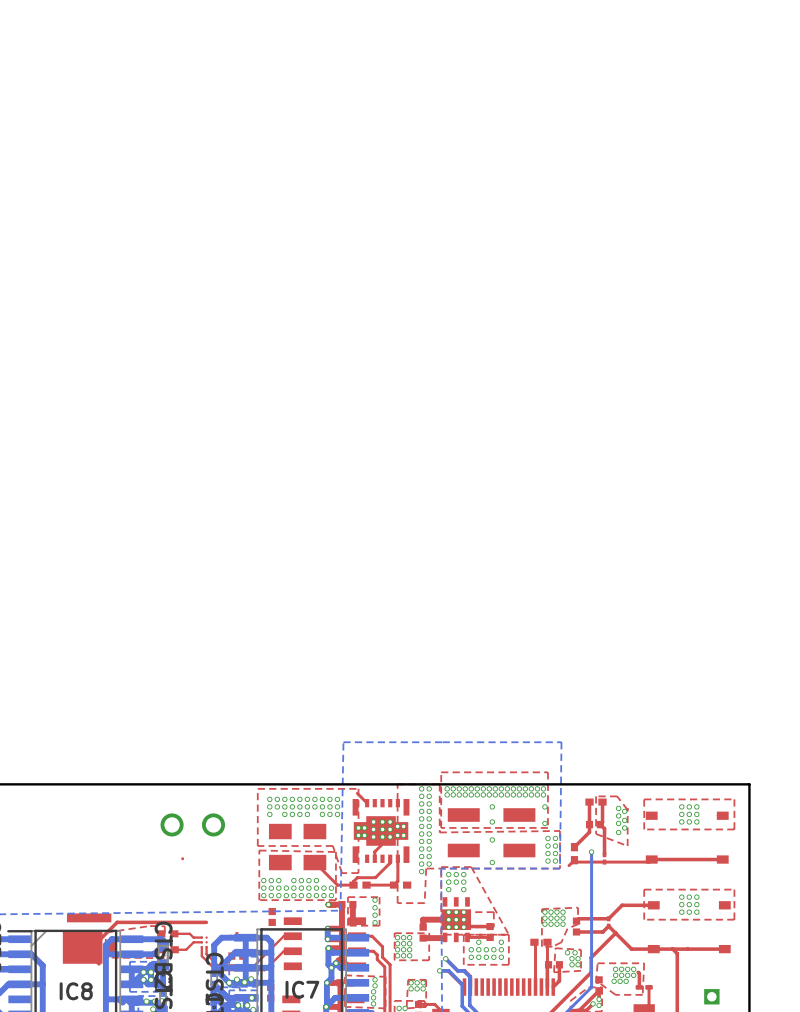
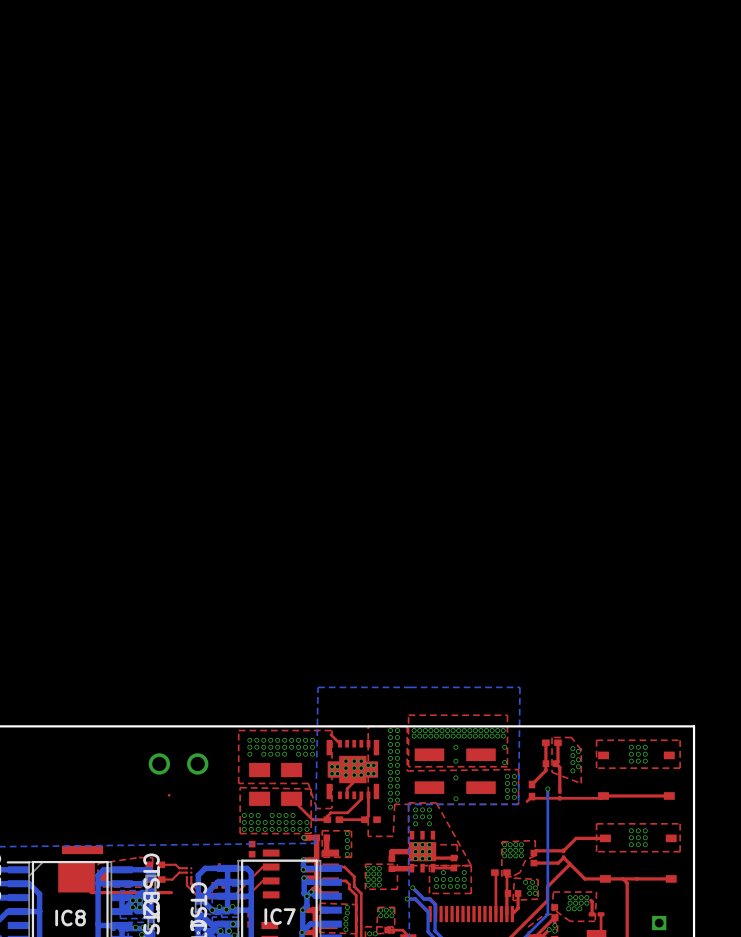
top track: (206, 922) (117, 922) (92, 947) (82, 947) -> none
top track: none -> (171, 892) (91, 892)

